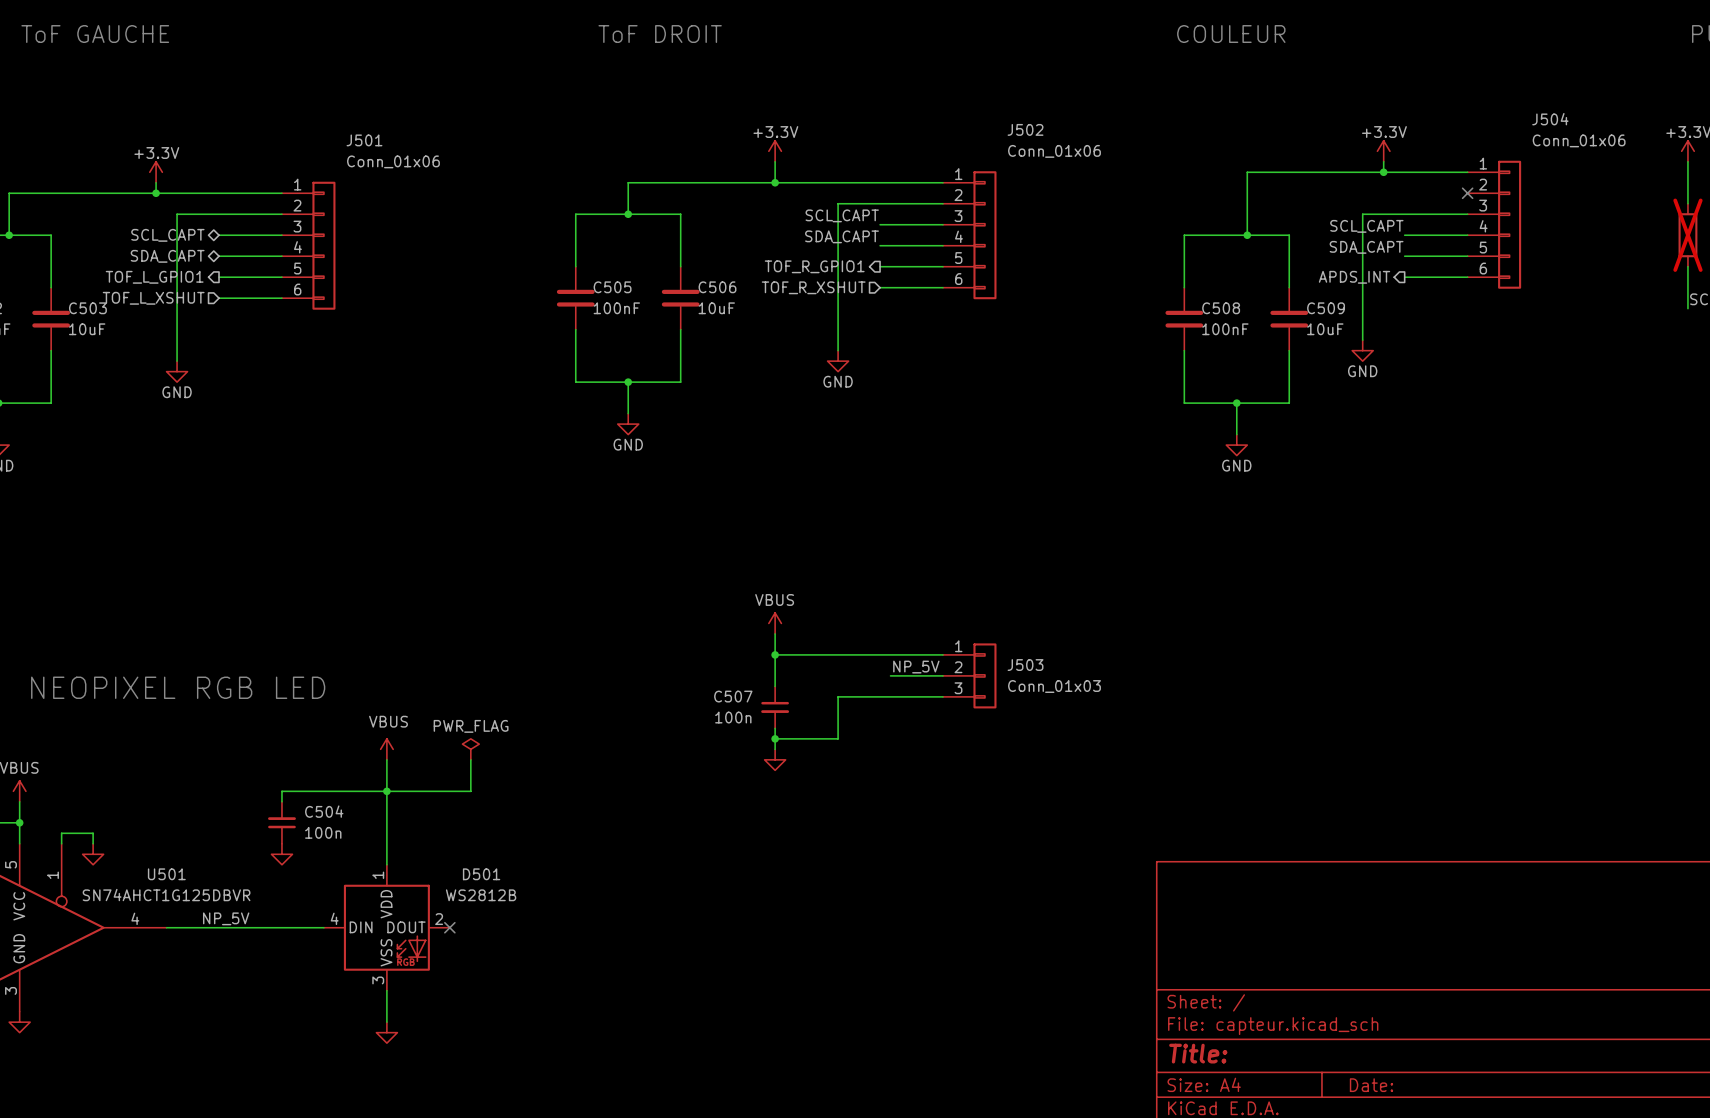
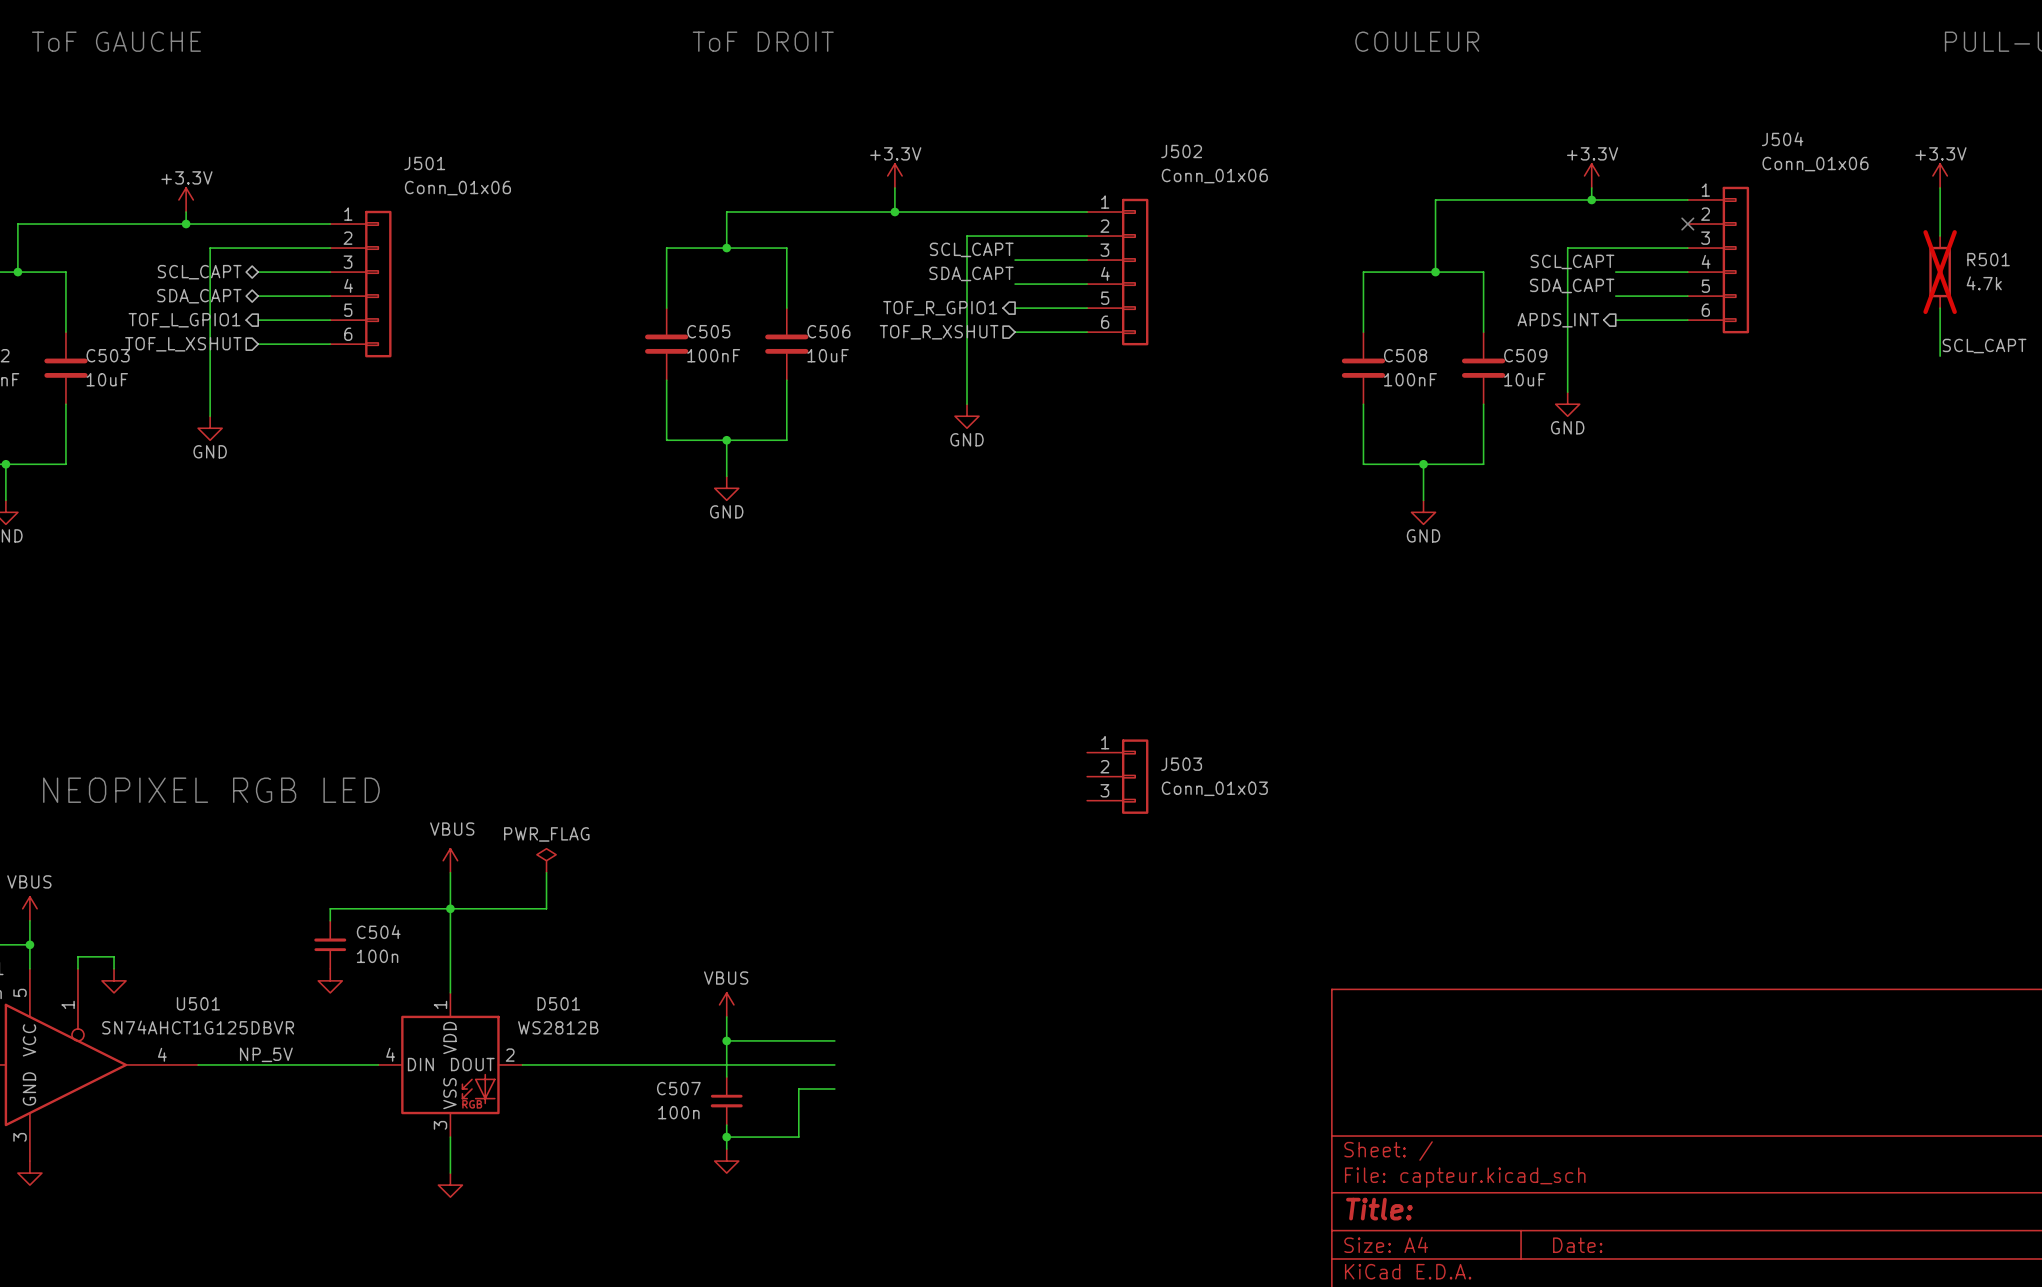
power symbol: VBUS (775, 623) -> none
wire: (775, 633) (775, 686) -> none
wire: (775, 654) (943, 654) -> none
junction: (775, 654) -> none
label: NP_5V (916, 667) -> none
wire: (890, 675) (943, 675) -> none
wire: (943, 696) (838, 696) (838, 738) (775, 738) -> none
C507 position: (775, 707) -> (726, 1101)
wire: (775, 728) (775, 749) -> none
junction: (775, 738) -> none
power symbol: (775, 759) -> none
power symbol: none -> VBUS (726, 1004)
wire: none -> (726, 1016) (726, 1076)
wire: none -> (726, 1040) (834, 1040)
junction: none -> (726, 1040)
wire: none -> (522, 1064) (834, 1064)
no-connect mark: (449, 927) -> none
wire: none -> (834, 1089) (798, 1089) (798, 1137) (726, 1137)
wire: none -> (726, 1125) (726, 1149)
junction: none -> (726, 1137)
power symbol: none -> (726, 1161)

